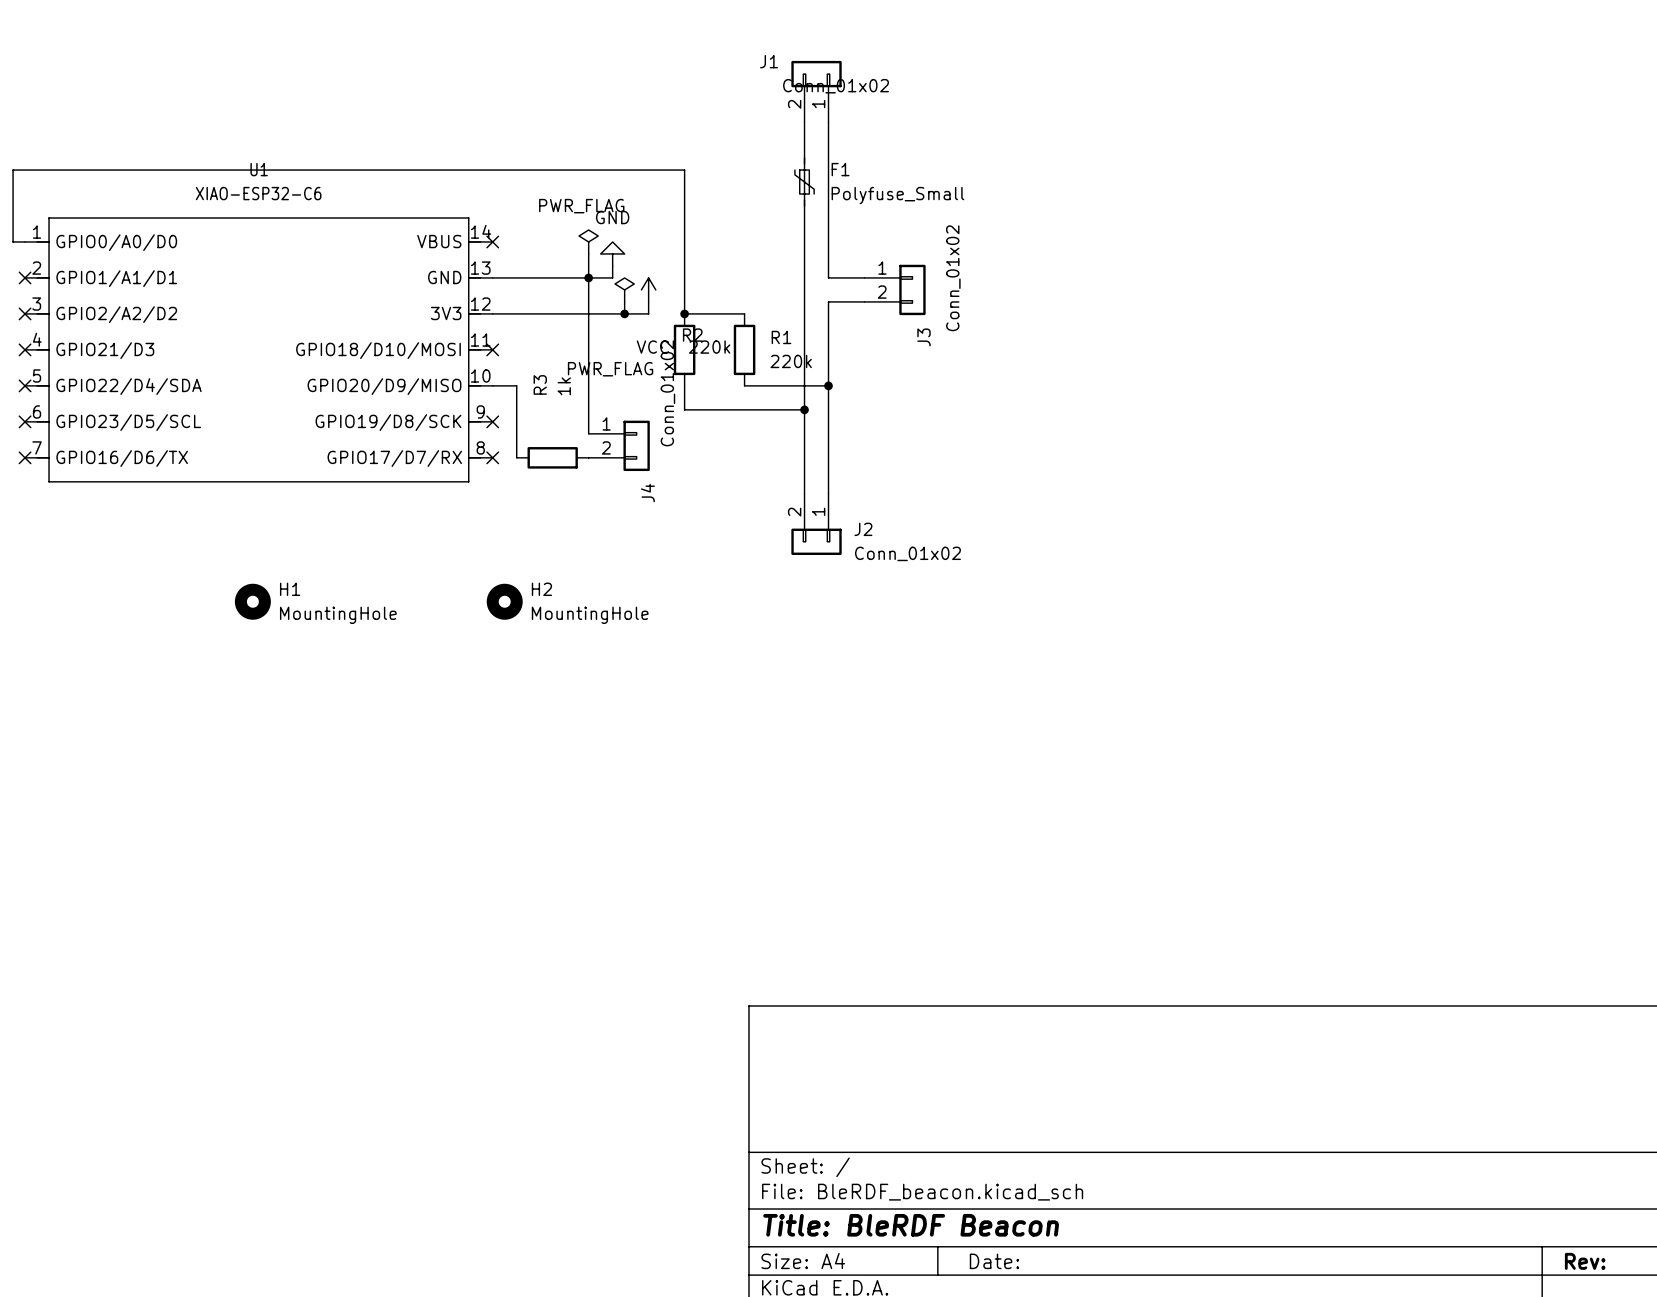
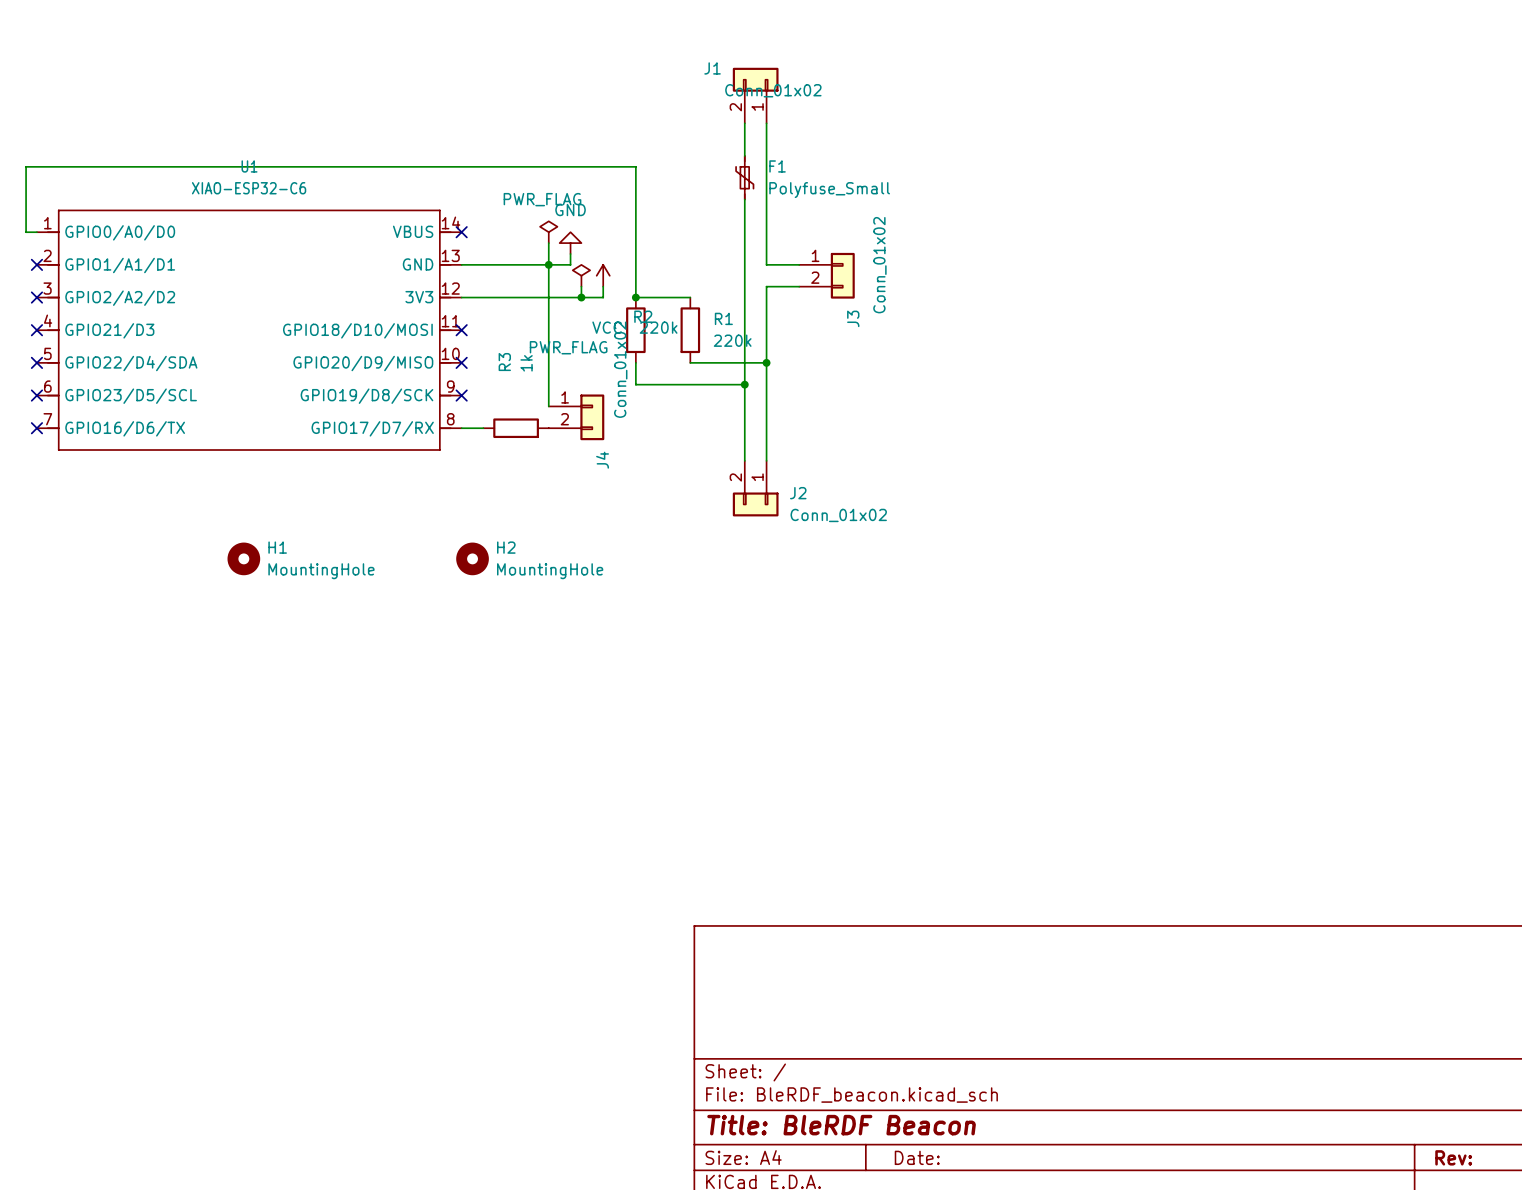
wire: (492, 385) (516, 385) (516, 457) -> (461, 428) (483, 428)
no-connect mark: none -> (461, 362)
no-connect mark: (492, 457) -> none

